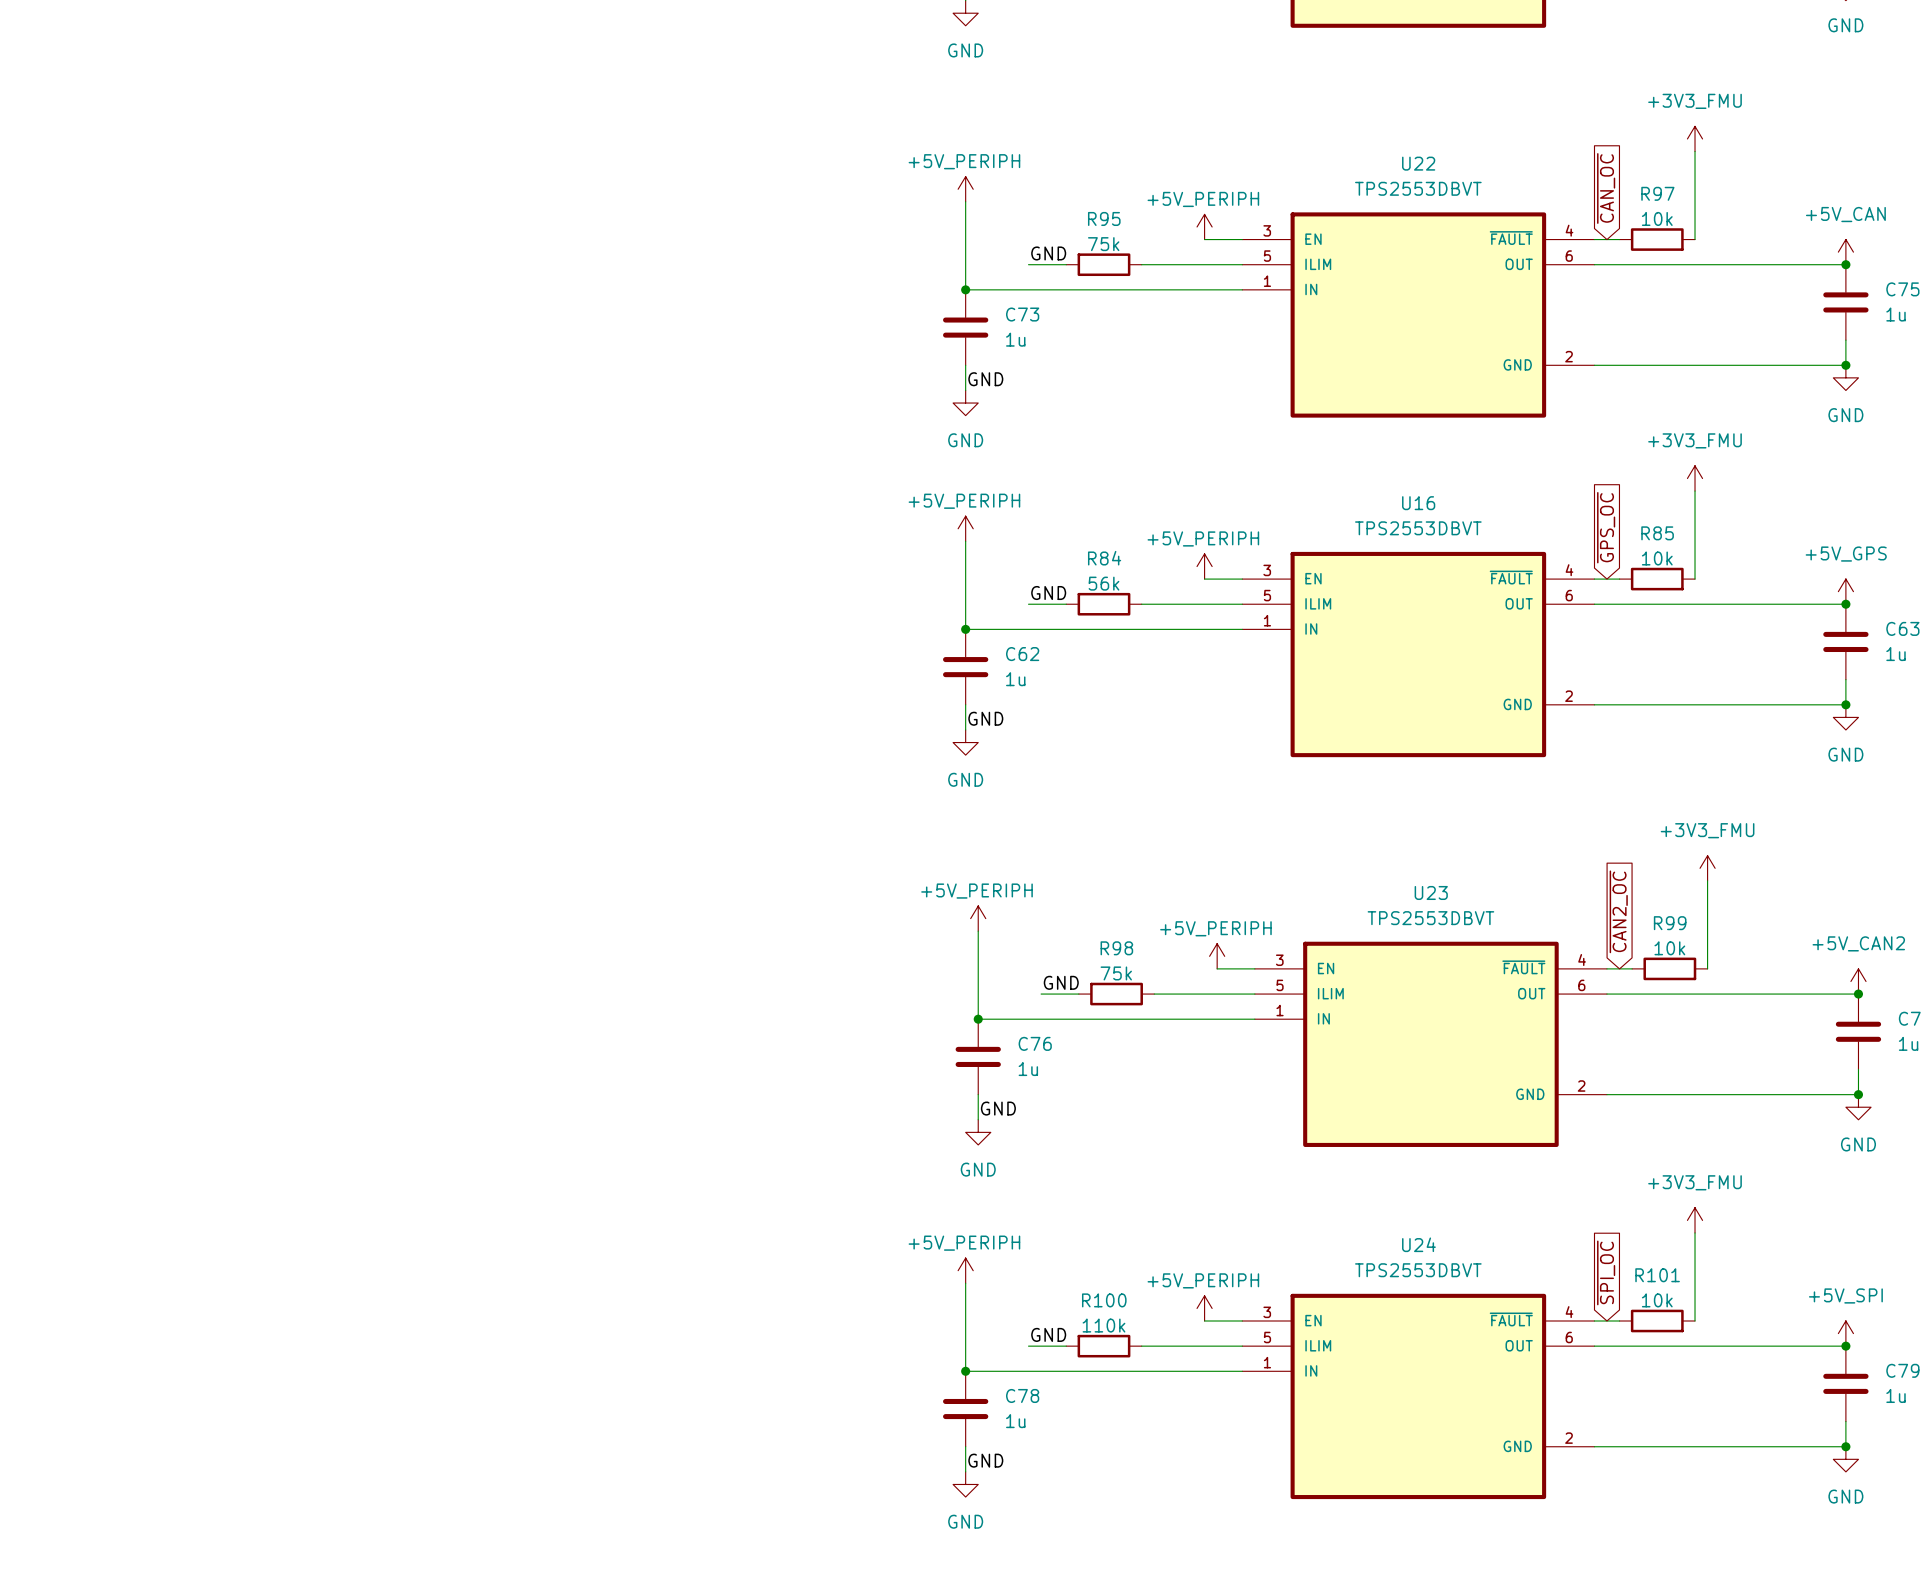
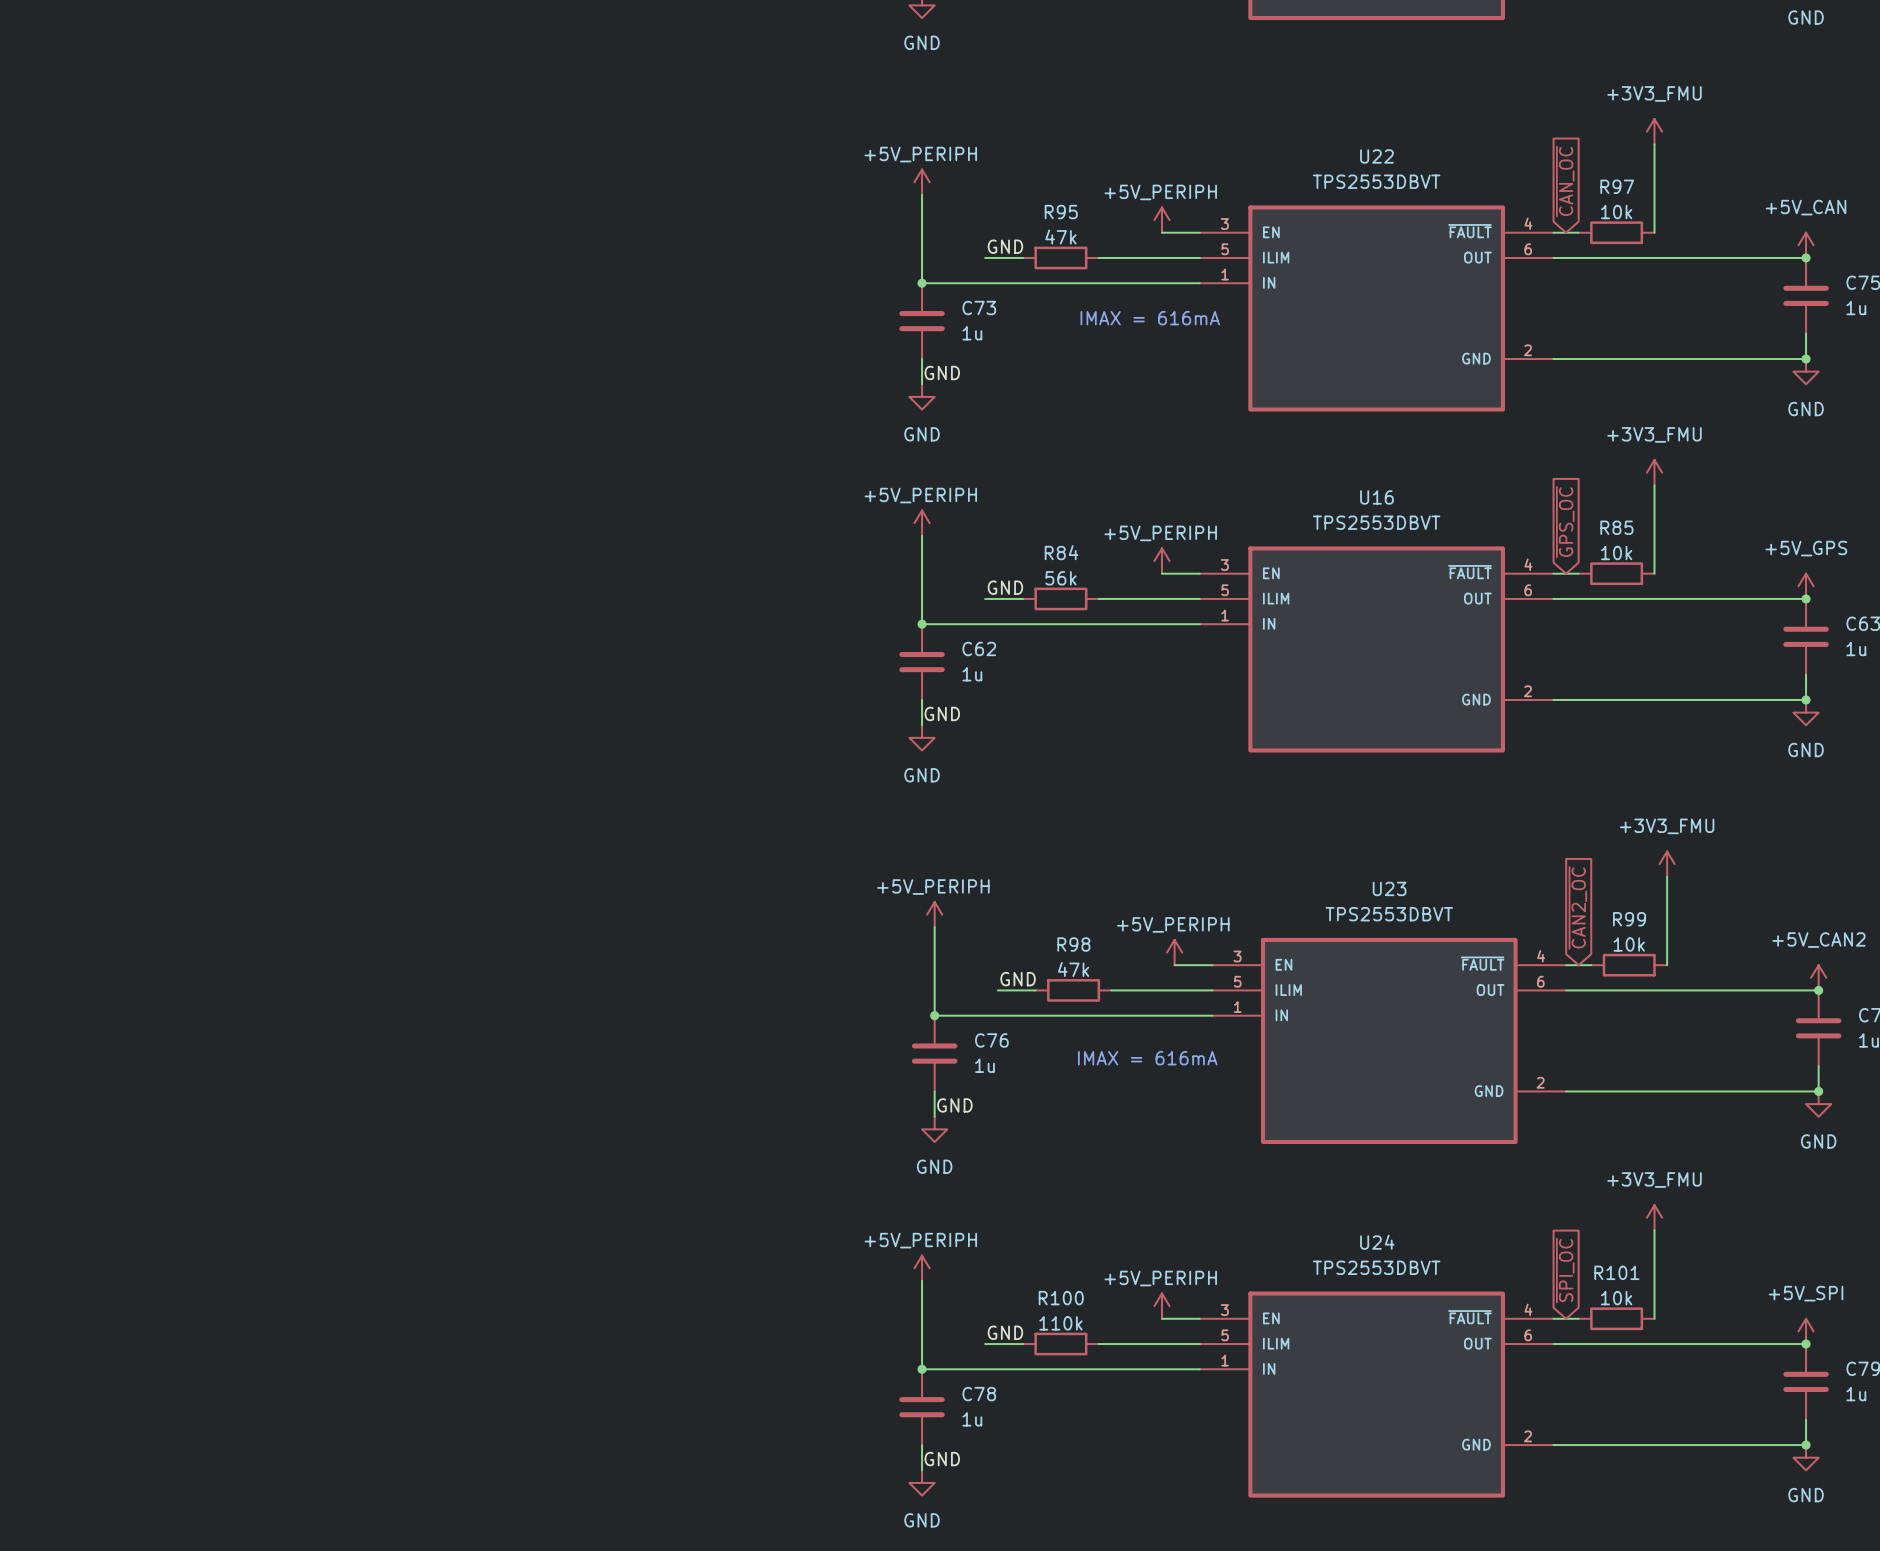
R95 value: 75k (1103, 244) -> 47k (1060, 237)
text: none -> IMAX = 616mA (1150, 318)
R98 value: 75k (1116, 973) -> 47k (1073, 969)
text: none -> IMAX = 616mA (1147, 1058)

